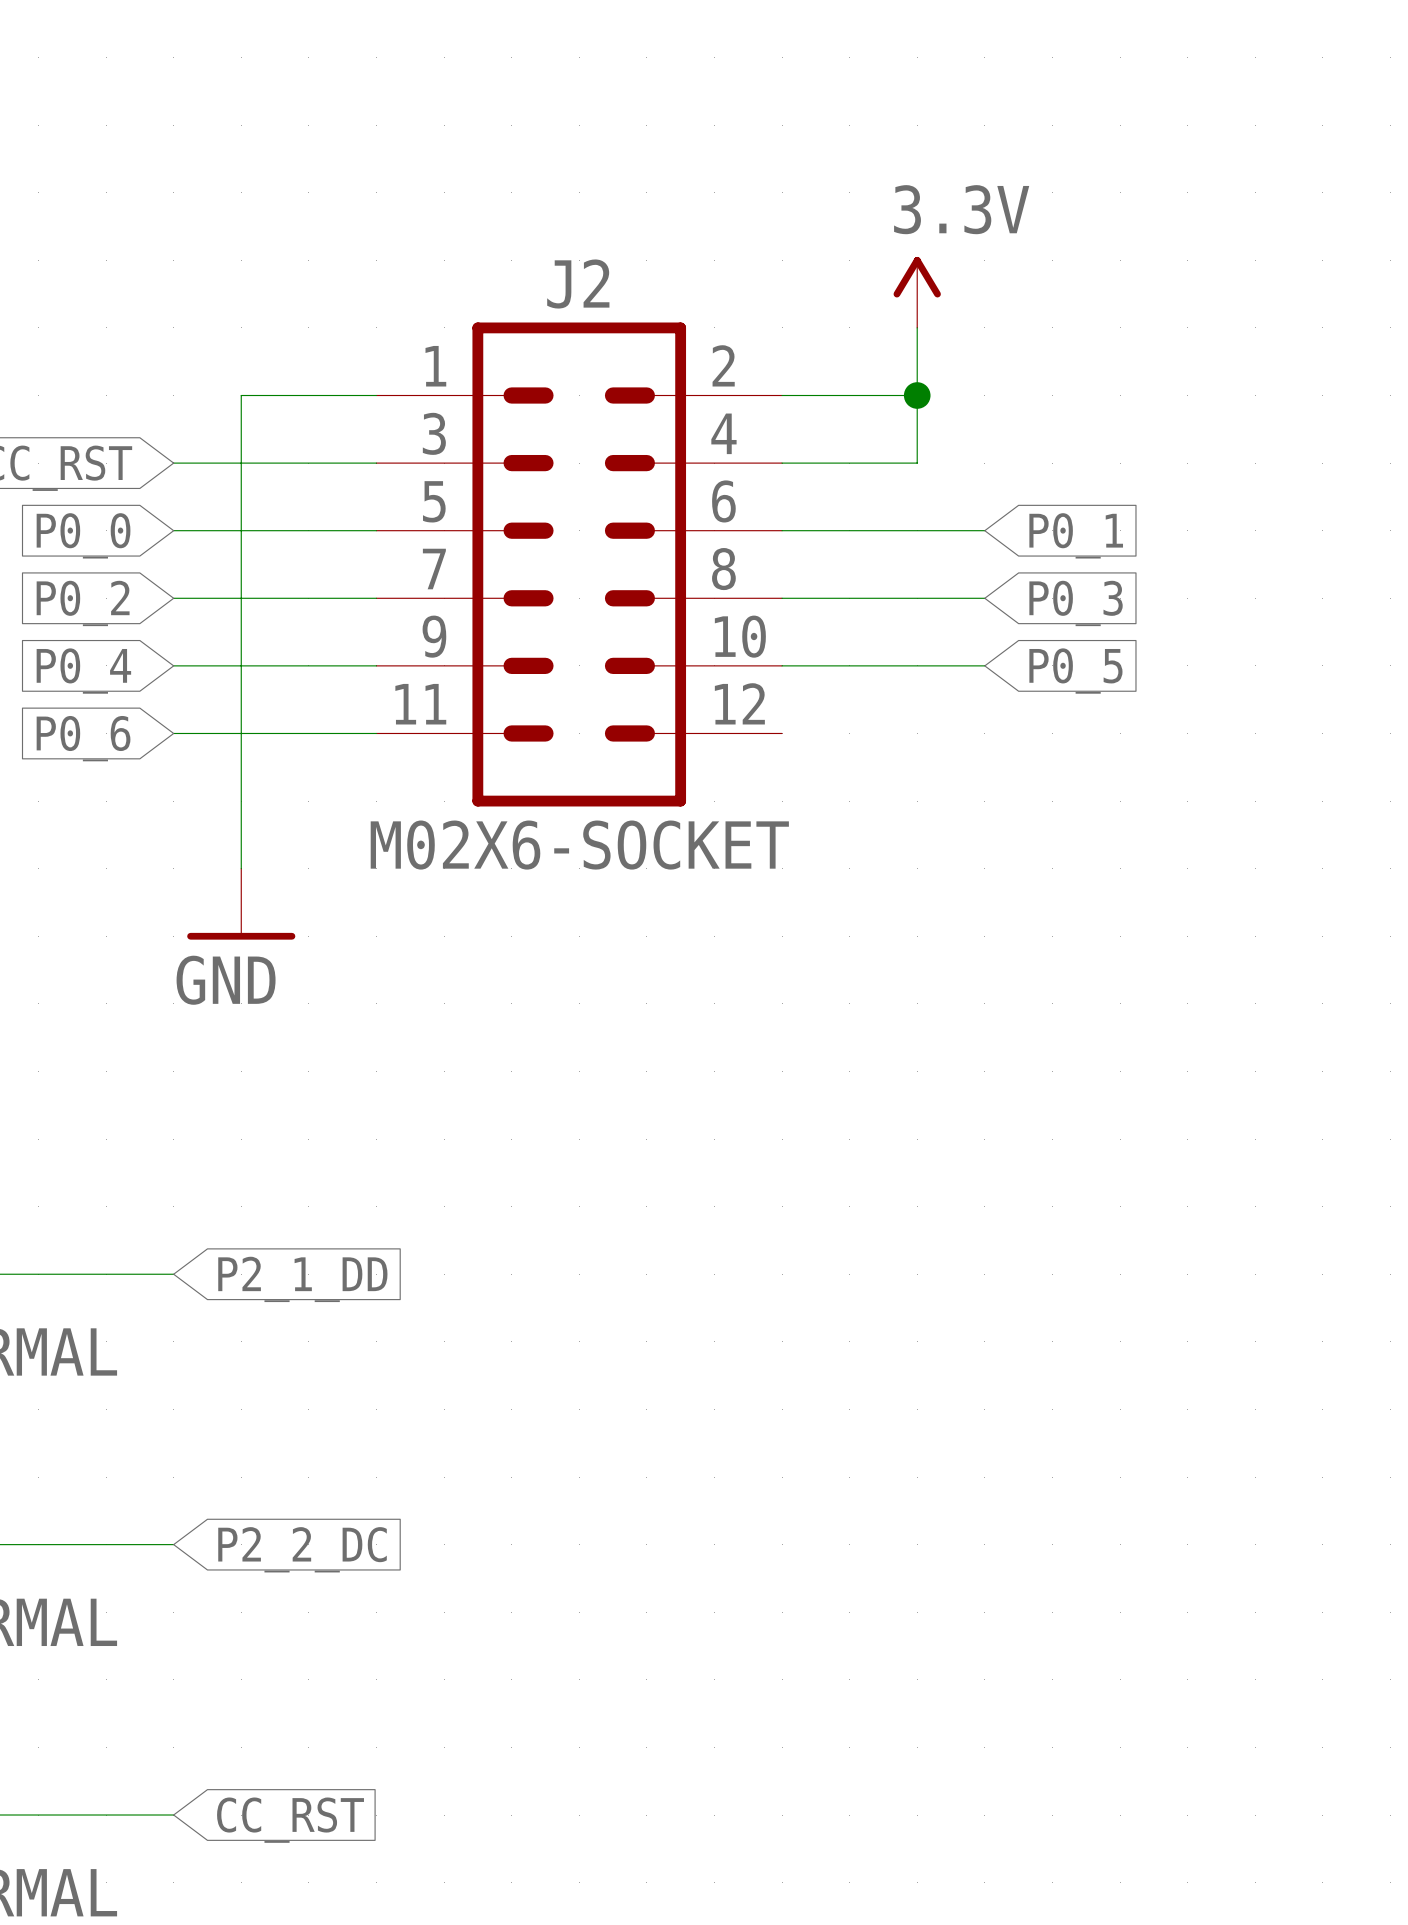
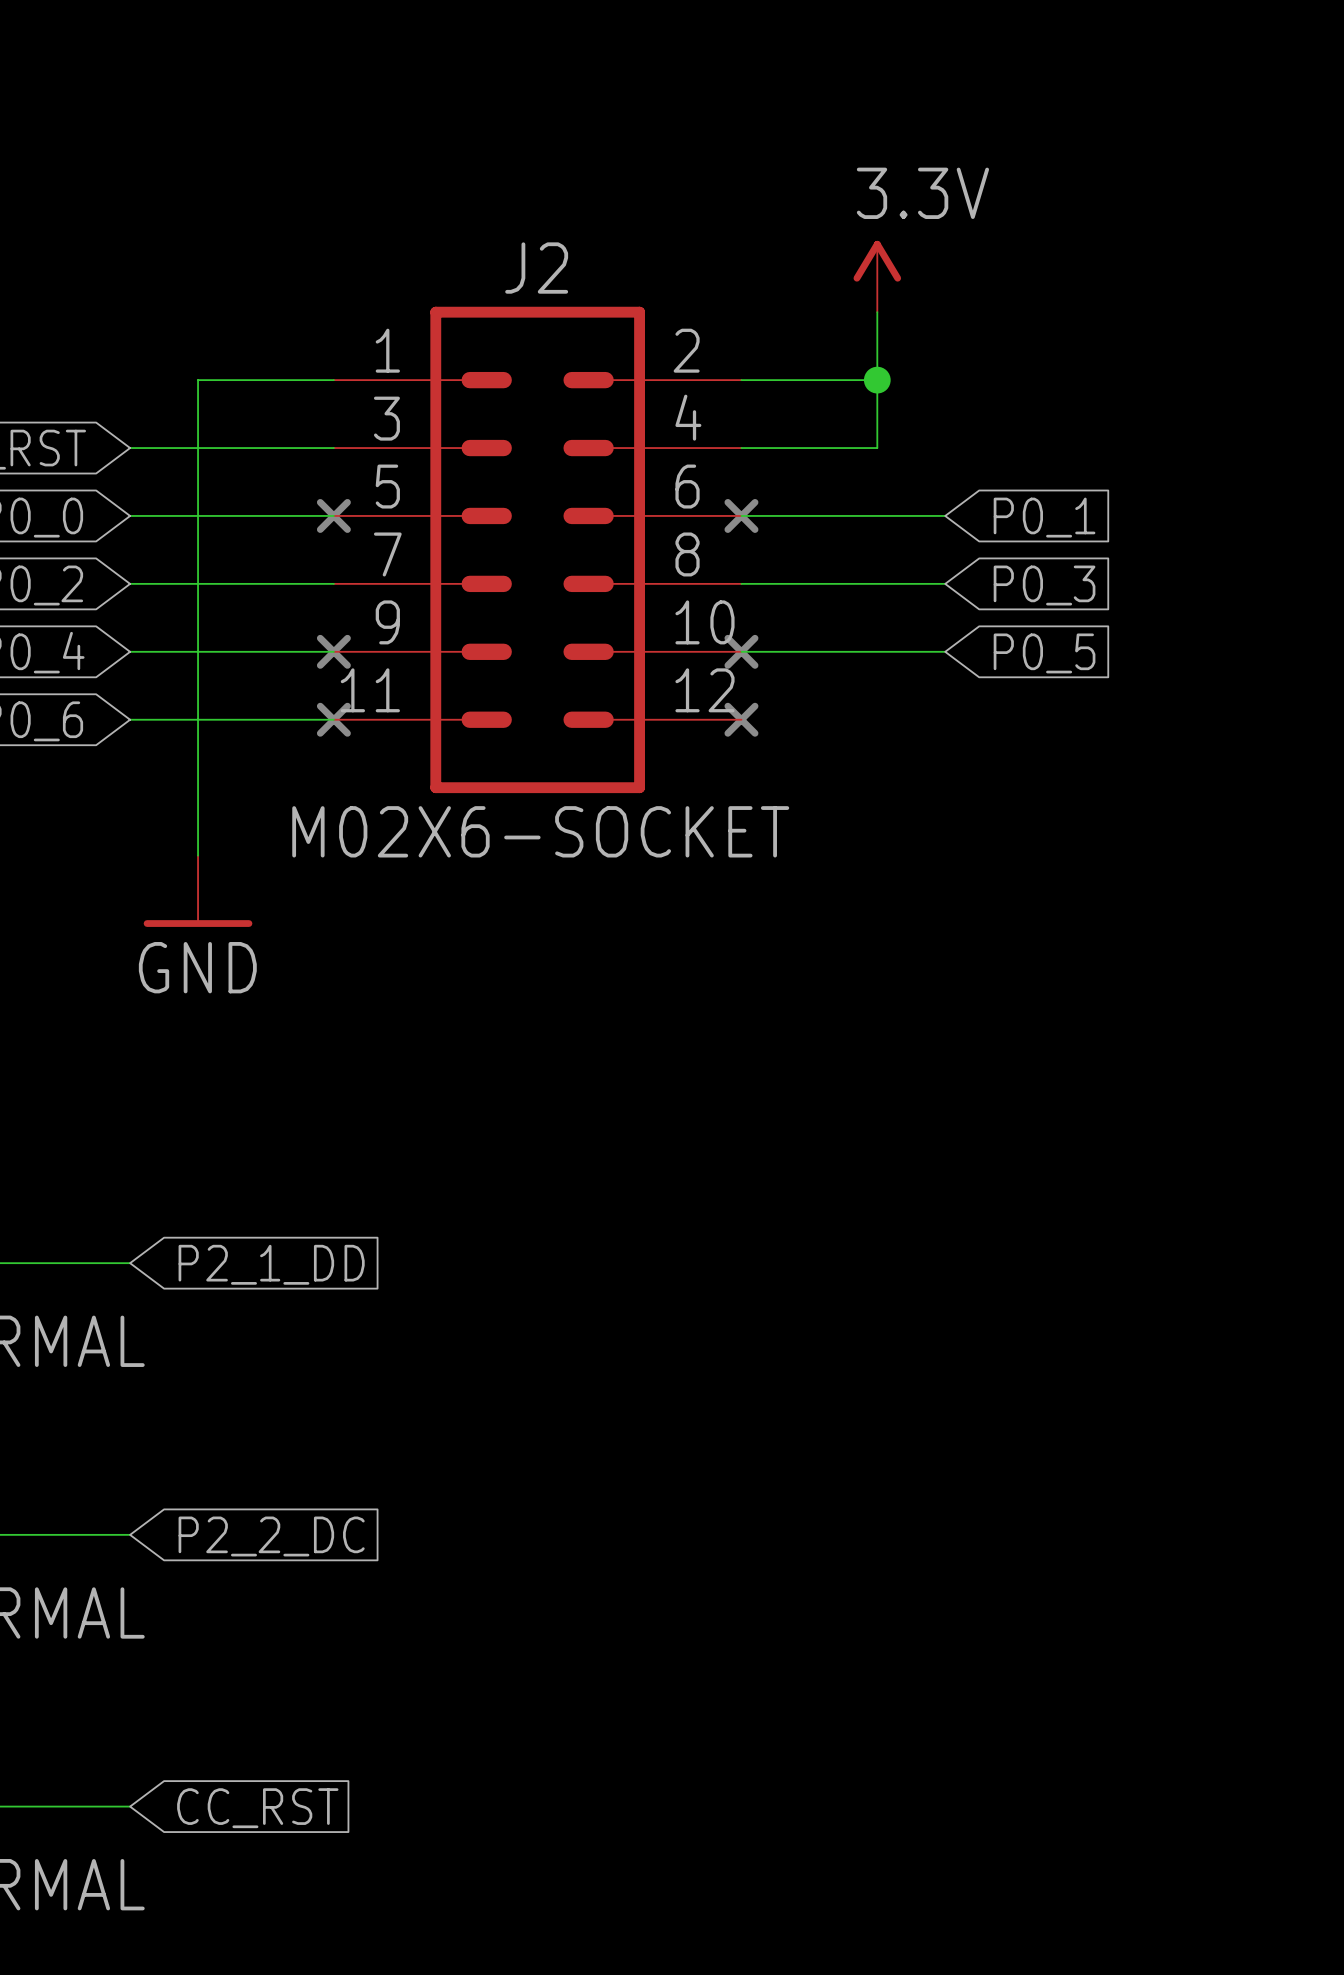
part: none -> (333, 515)
part: none -> (741, 515)
part: none -> (333, 651)
part: none -> (741, 651)
part: none -> (333, 719)
part: none -> (741, 719)

